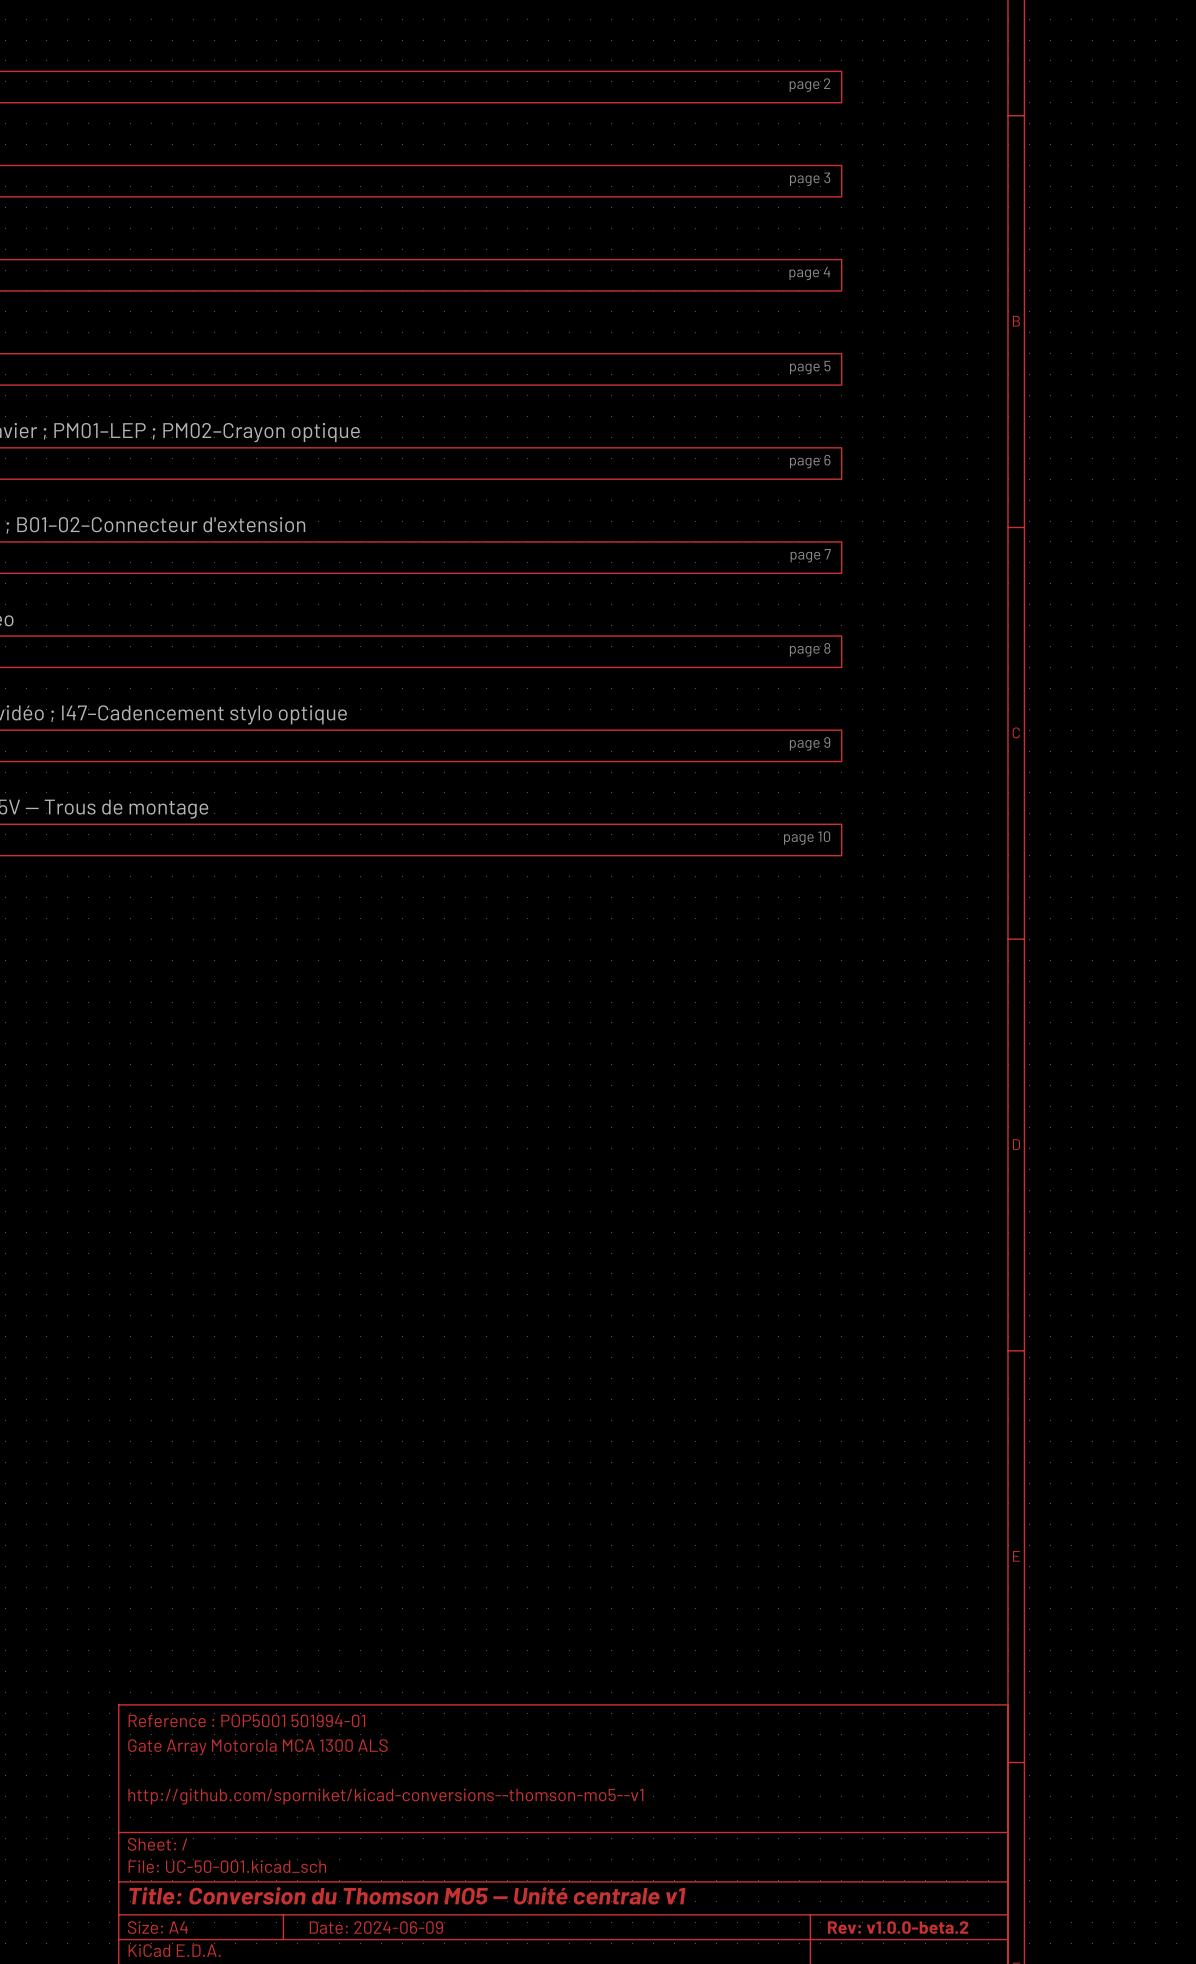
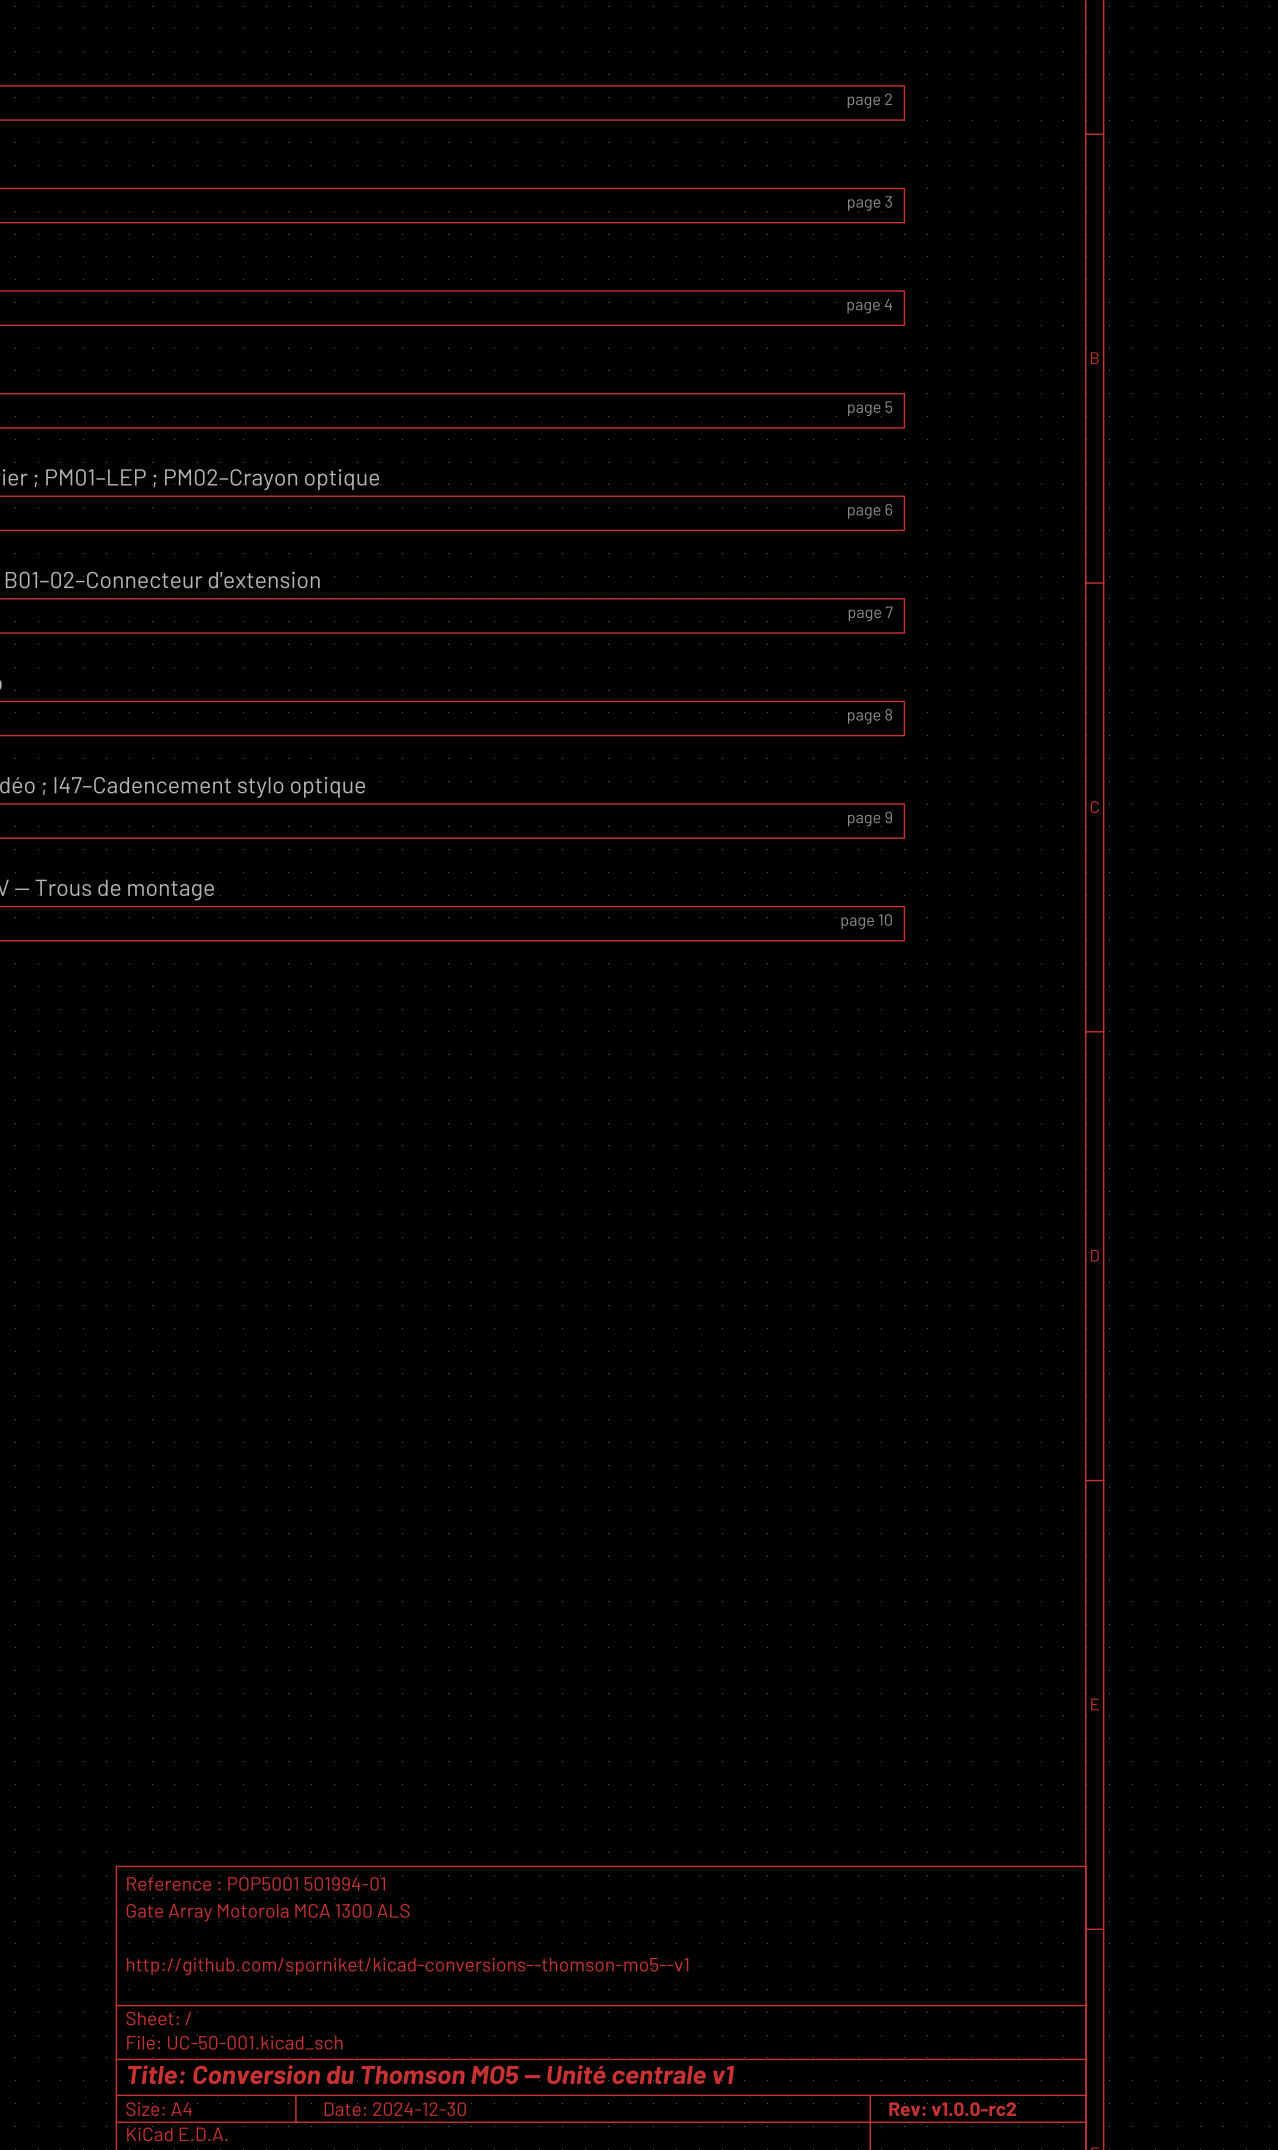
title block: Date: 2024-06-09 (376, 1927) -> Date: 2024-12-30 (395, 2109)
title block: Rev: v1.0.0-beta.2 (898, 1927) -> Rev: v1.0.0-rc2 (952, 2109)

